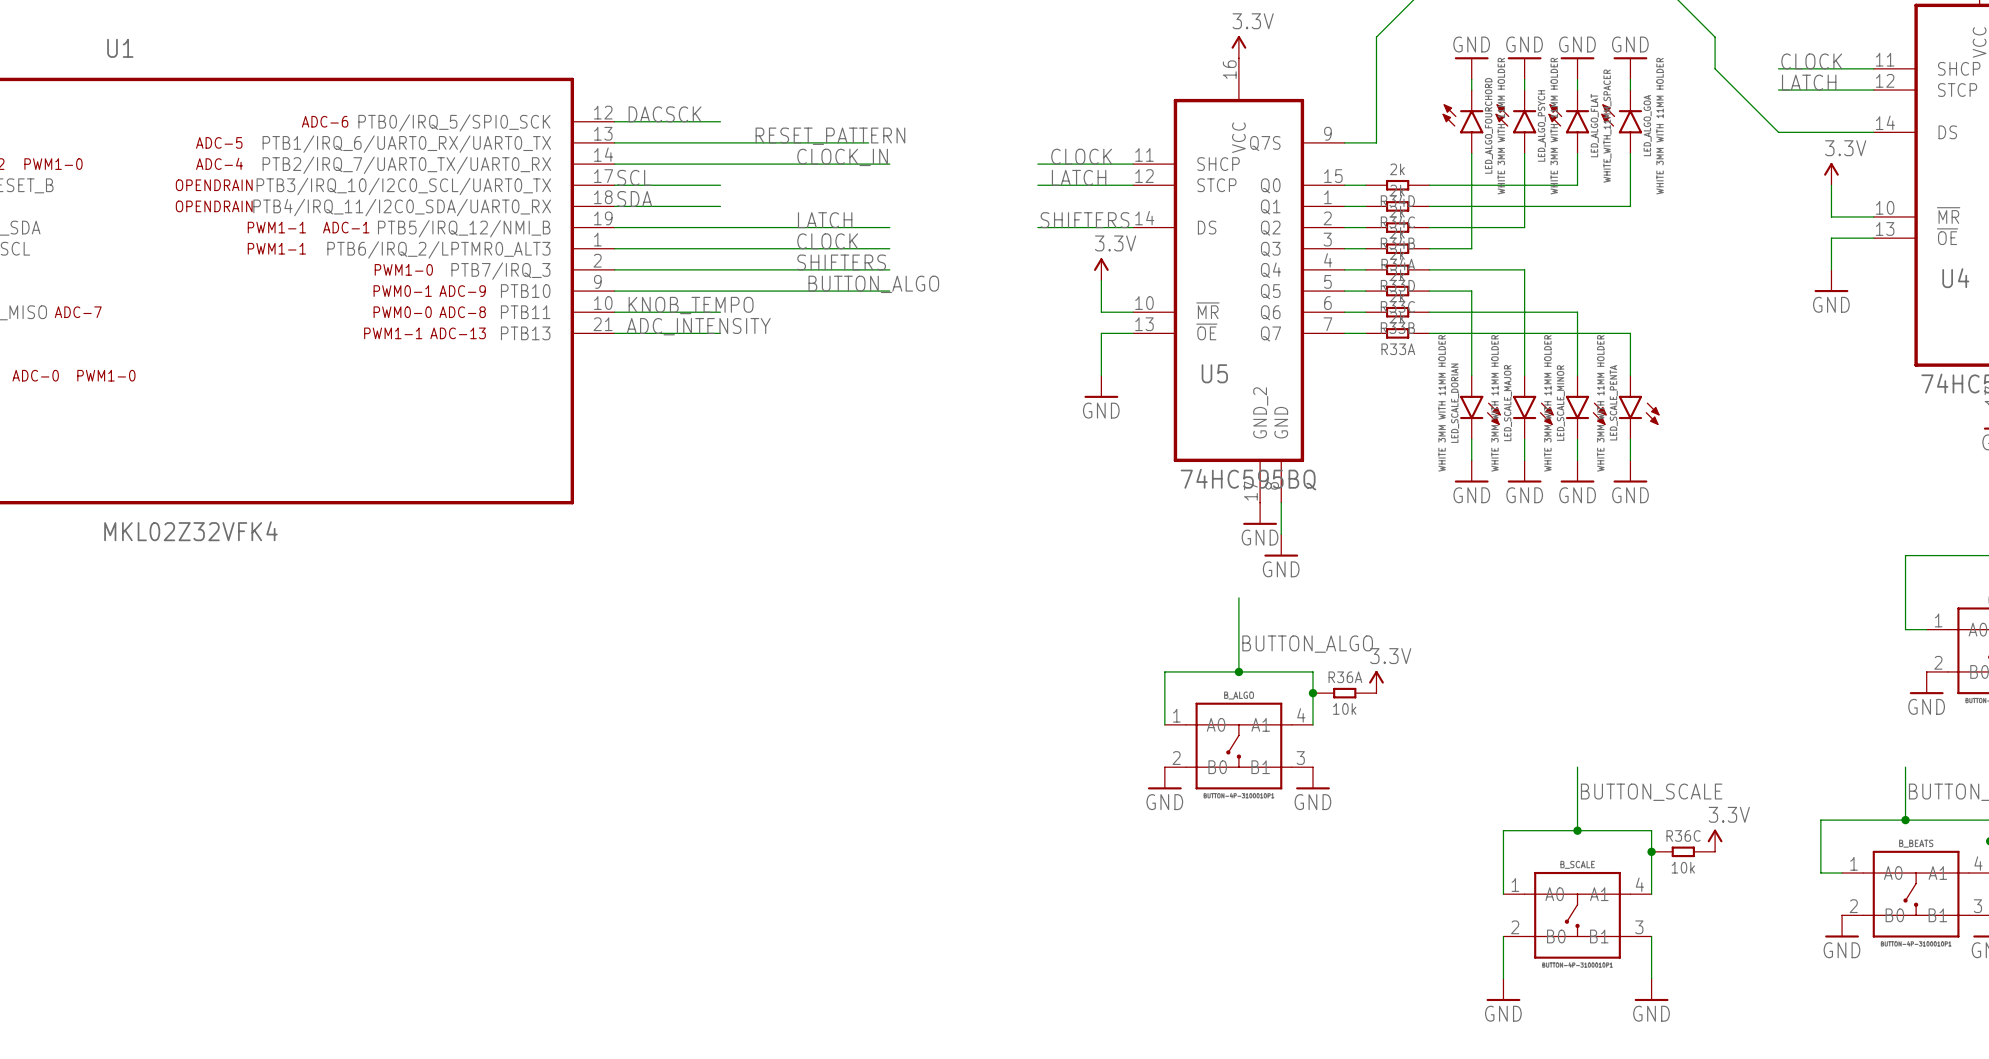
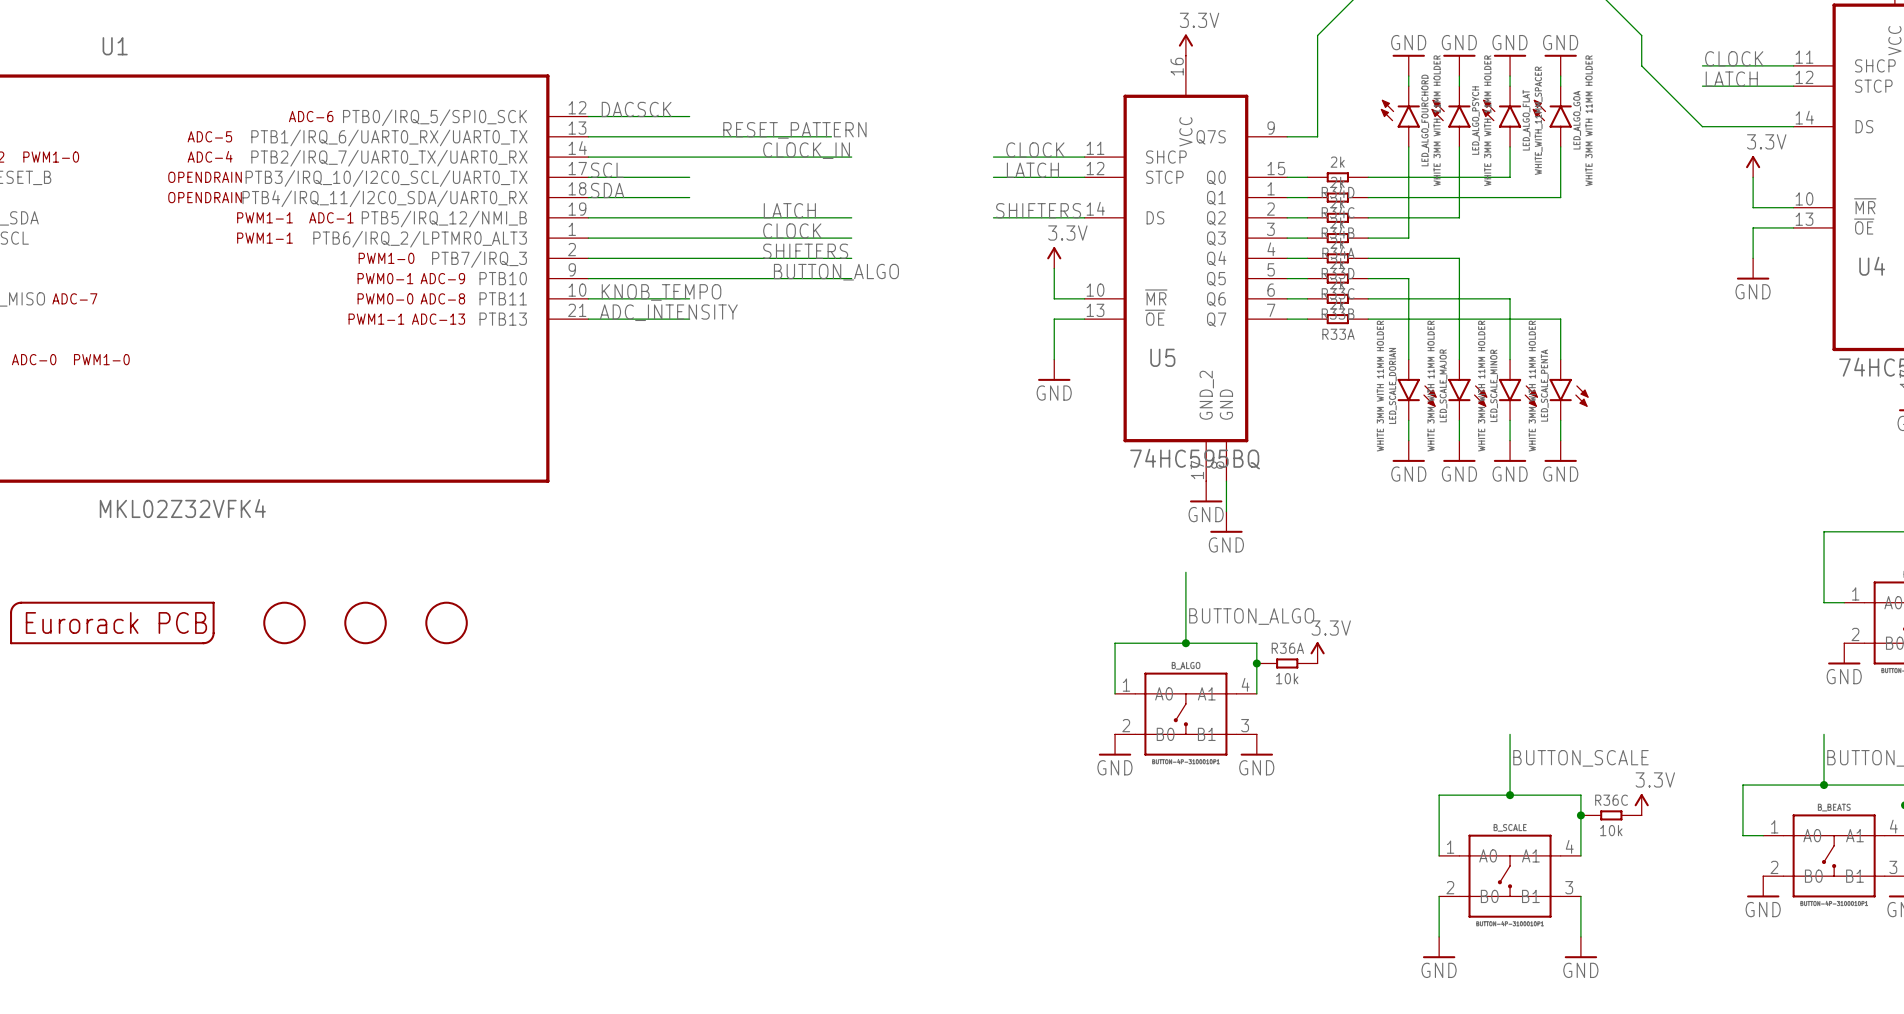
part: none -> (112, 622)
part: none -> (284, 622)
part: none -> (365, 622)
part: none -> (446, 622)

